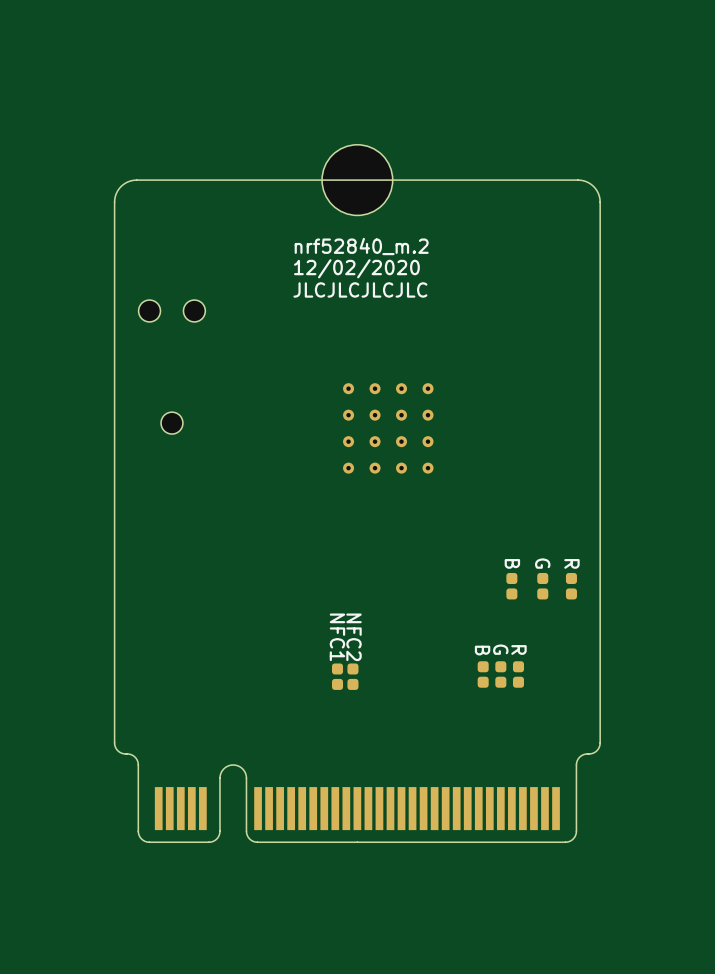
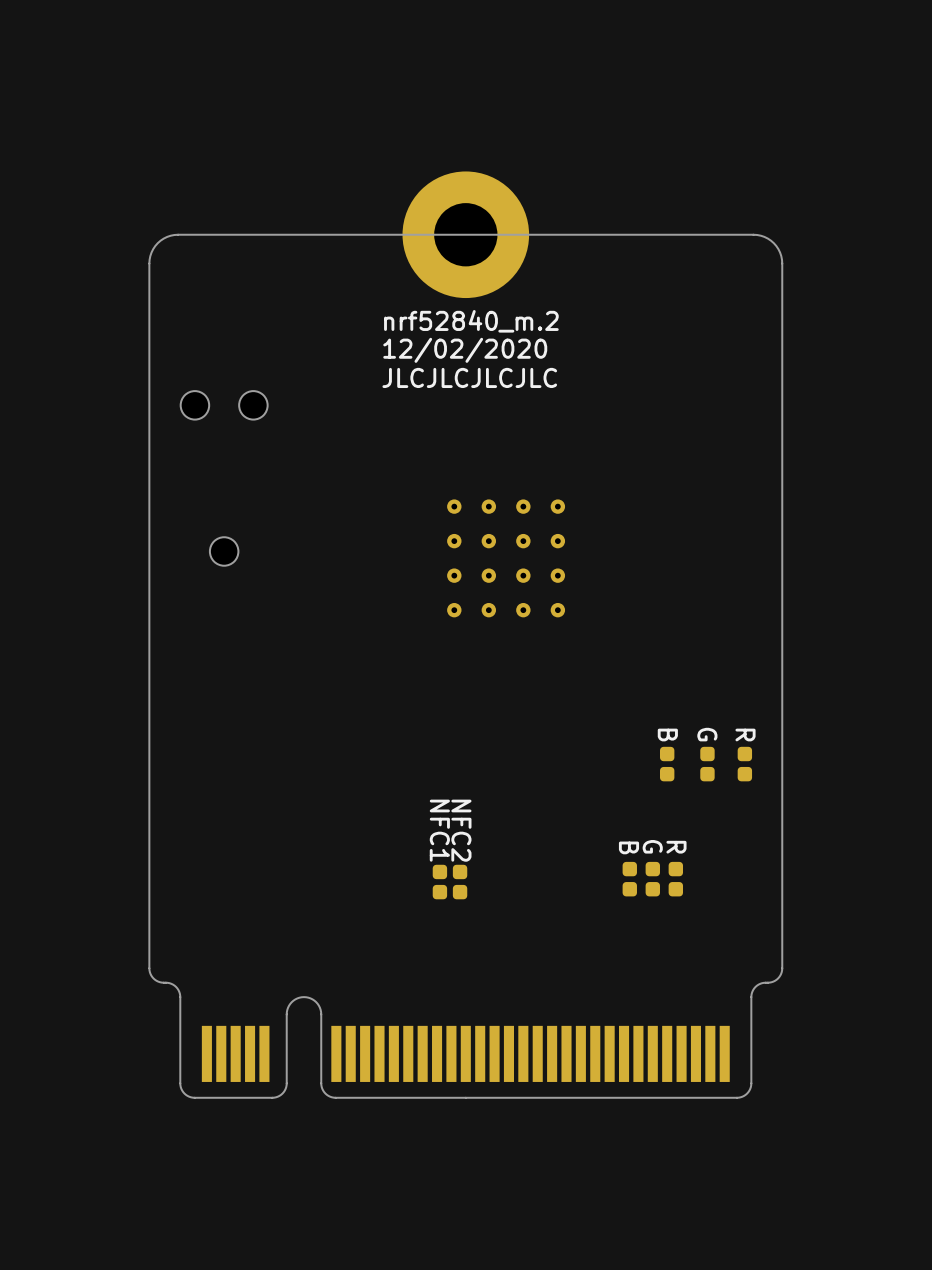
part footprint: [322, 144, 393, 216] -> [402, 171, 530, 299]

